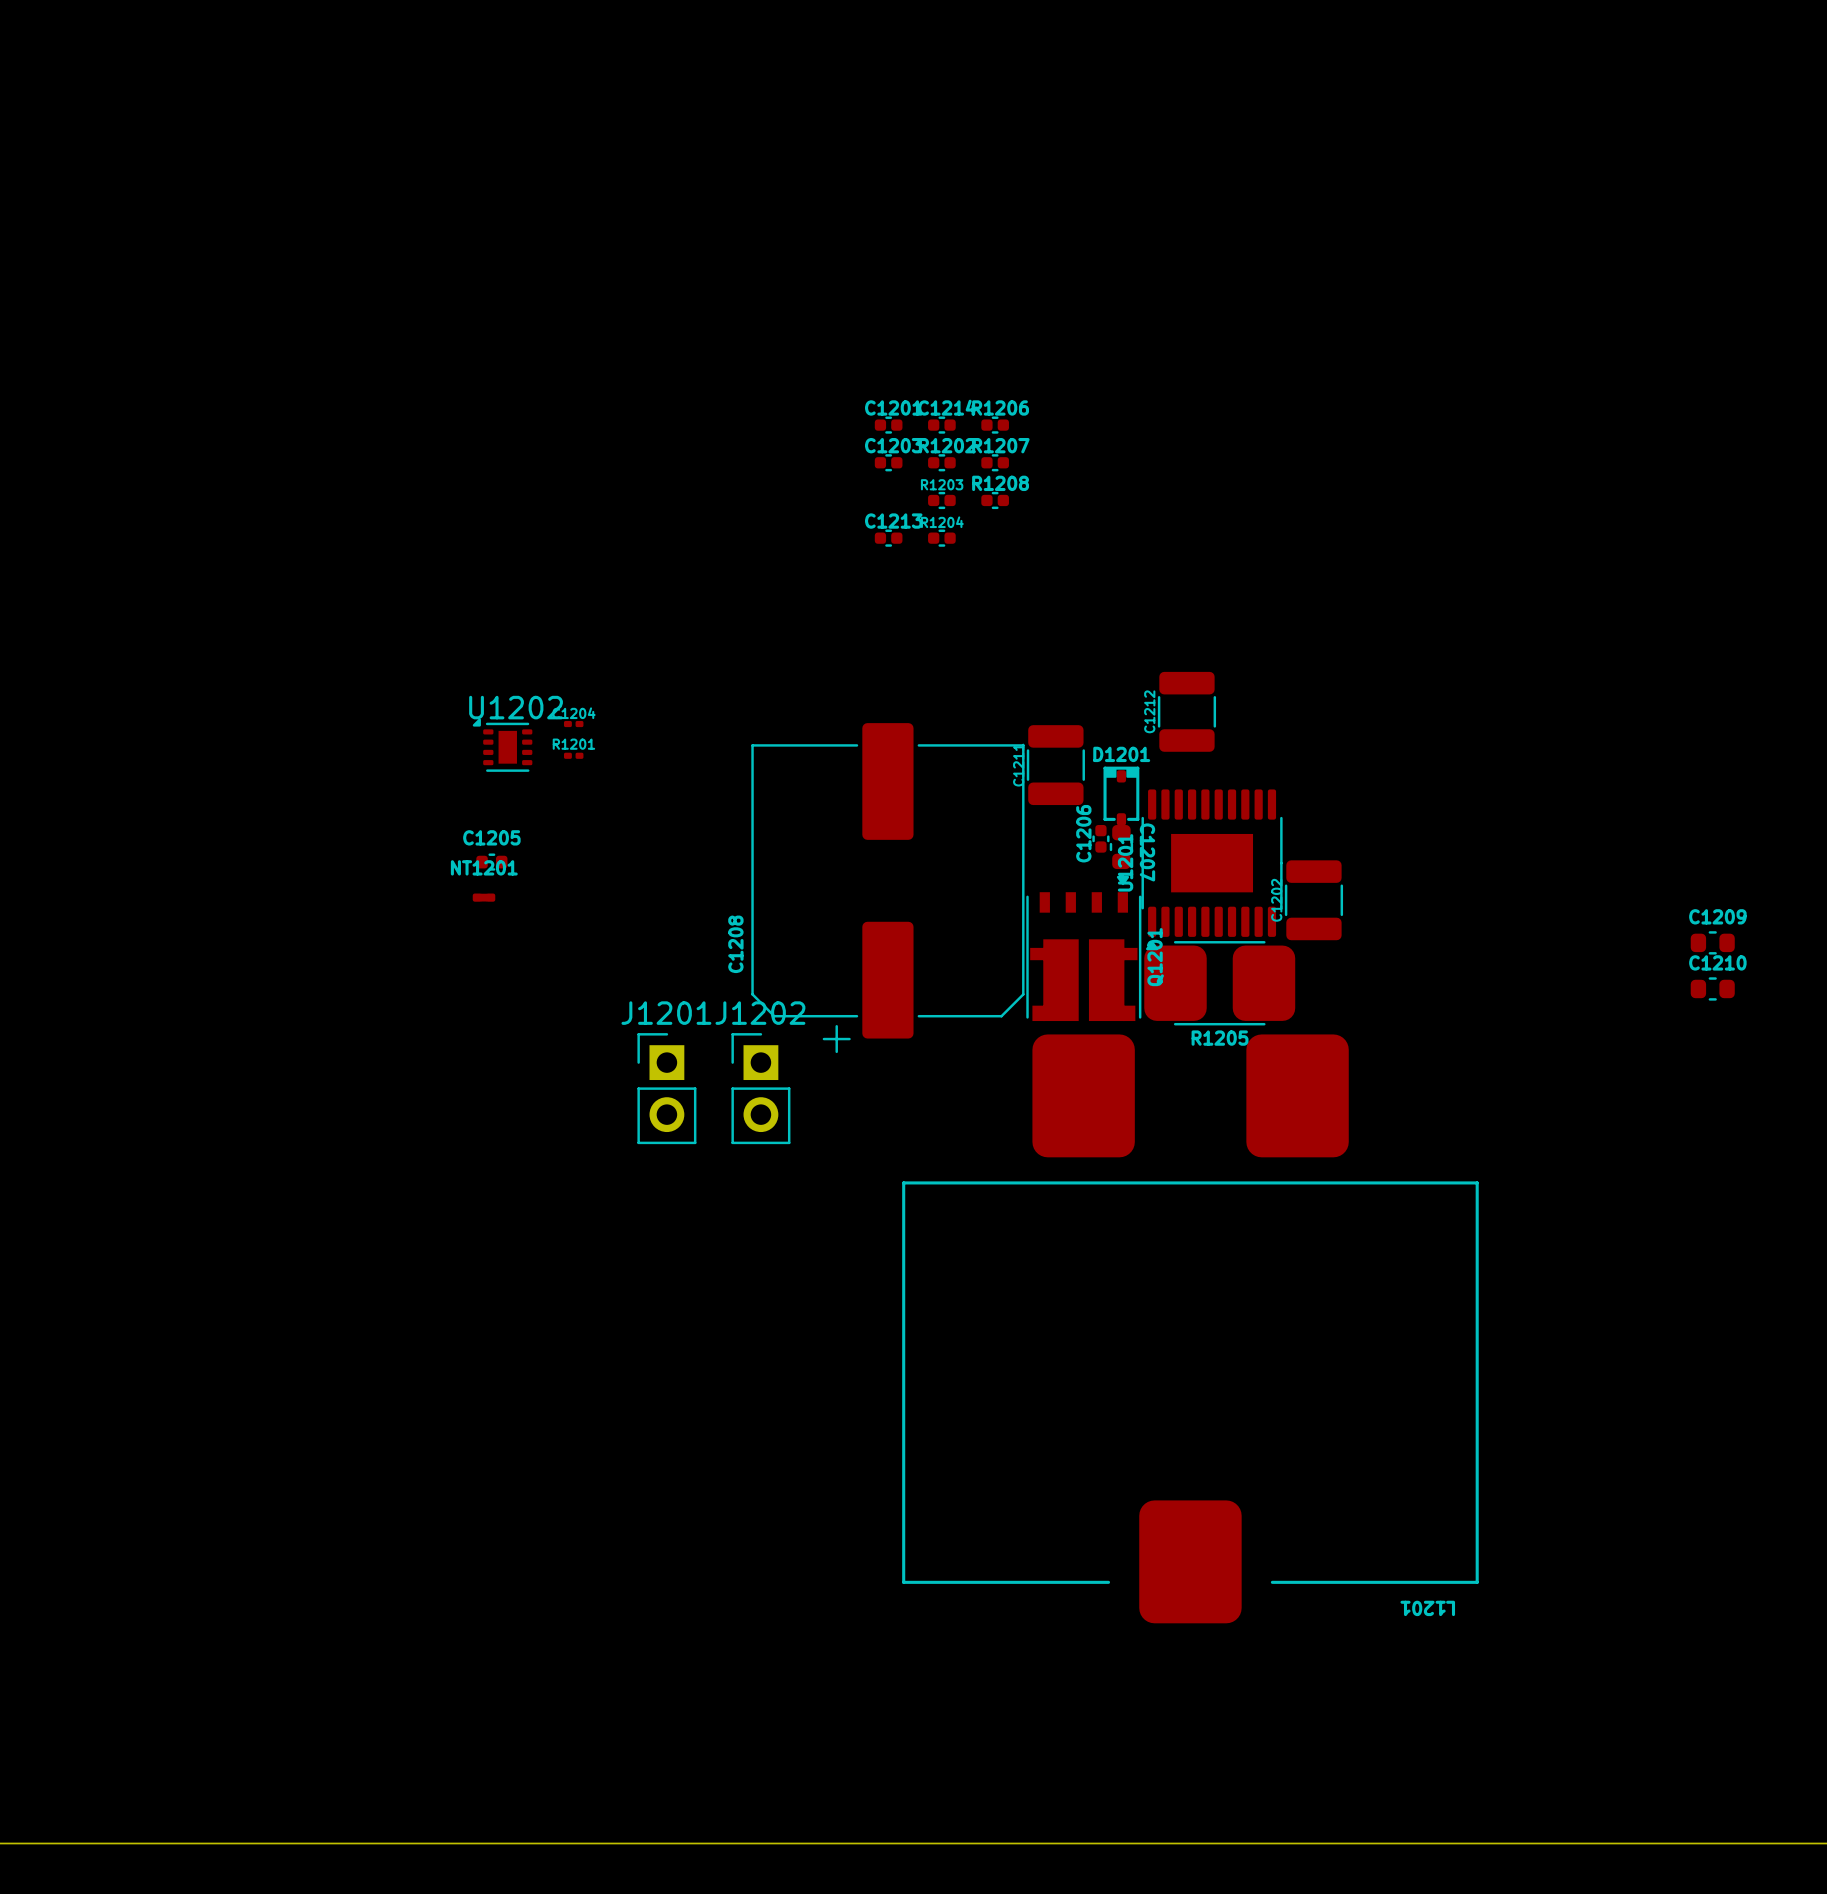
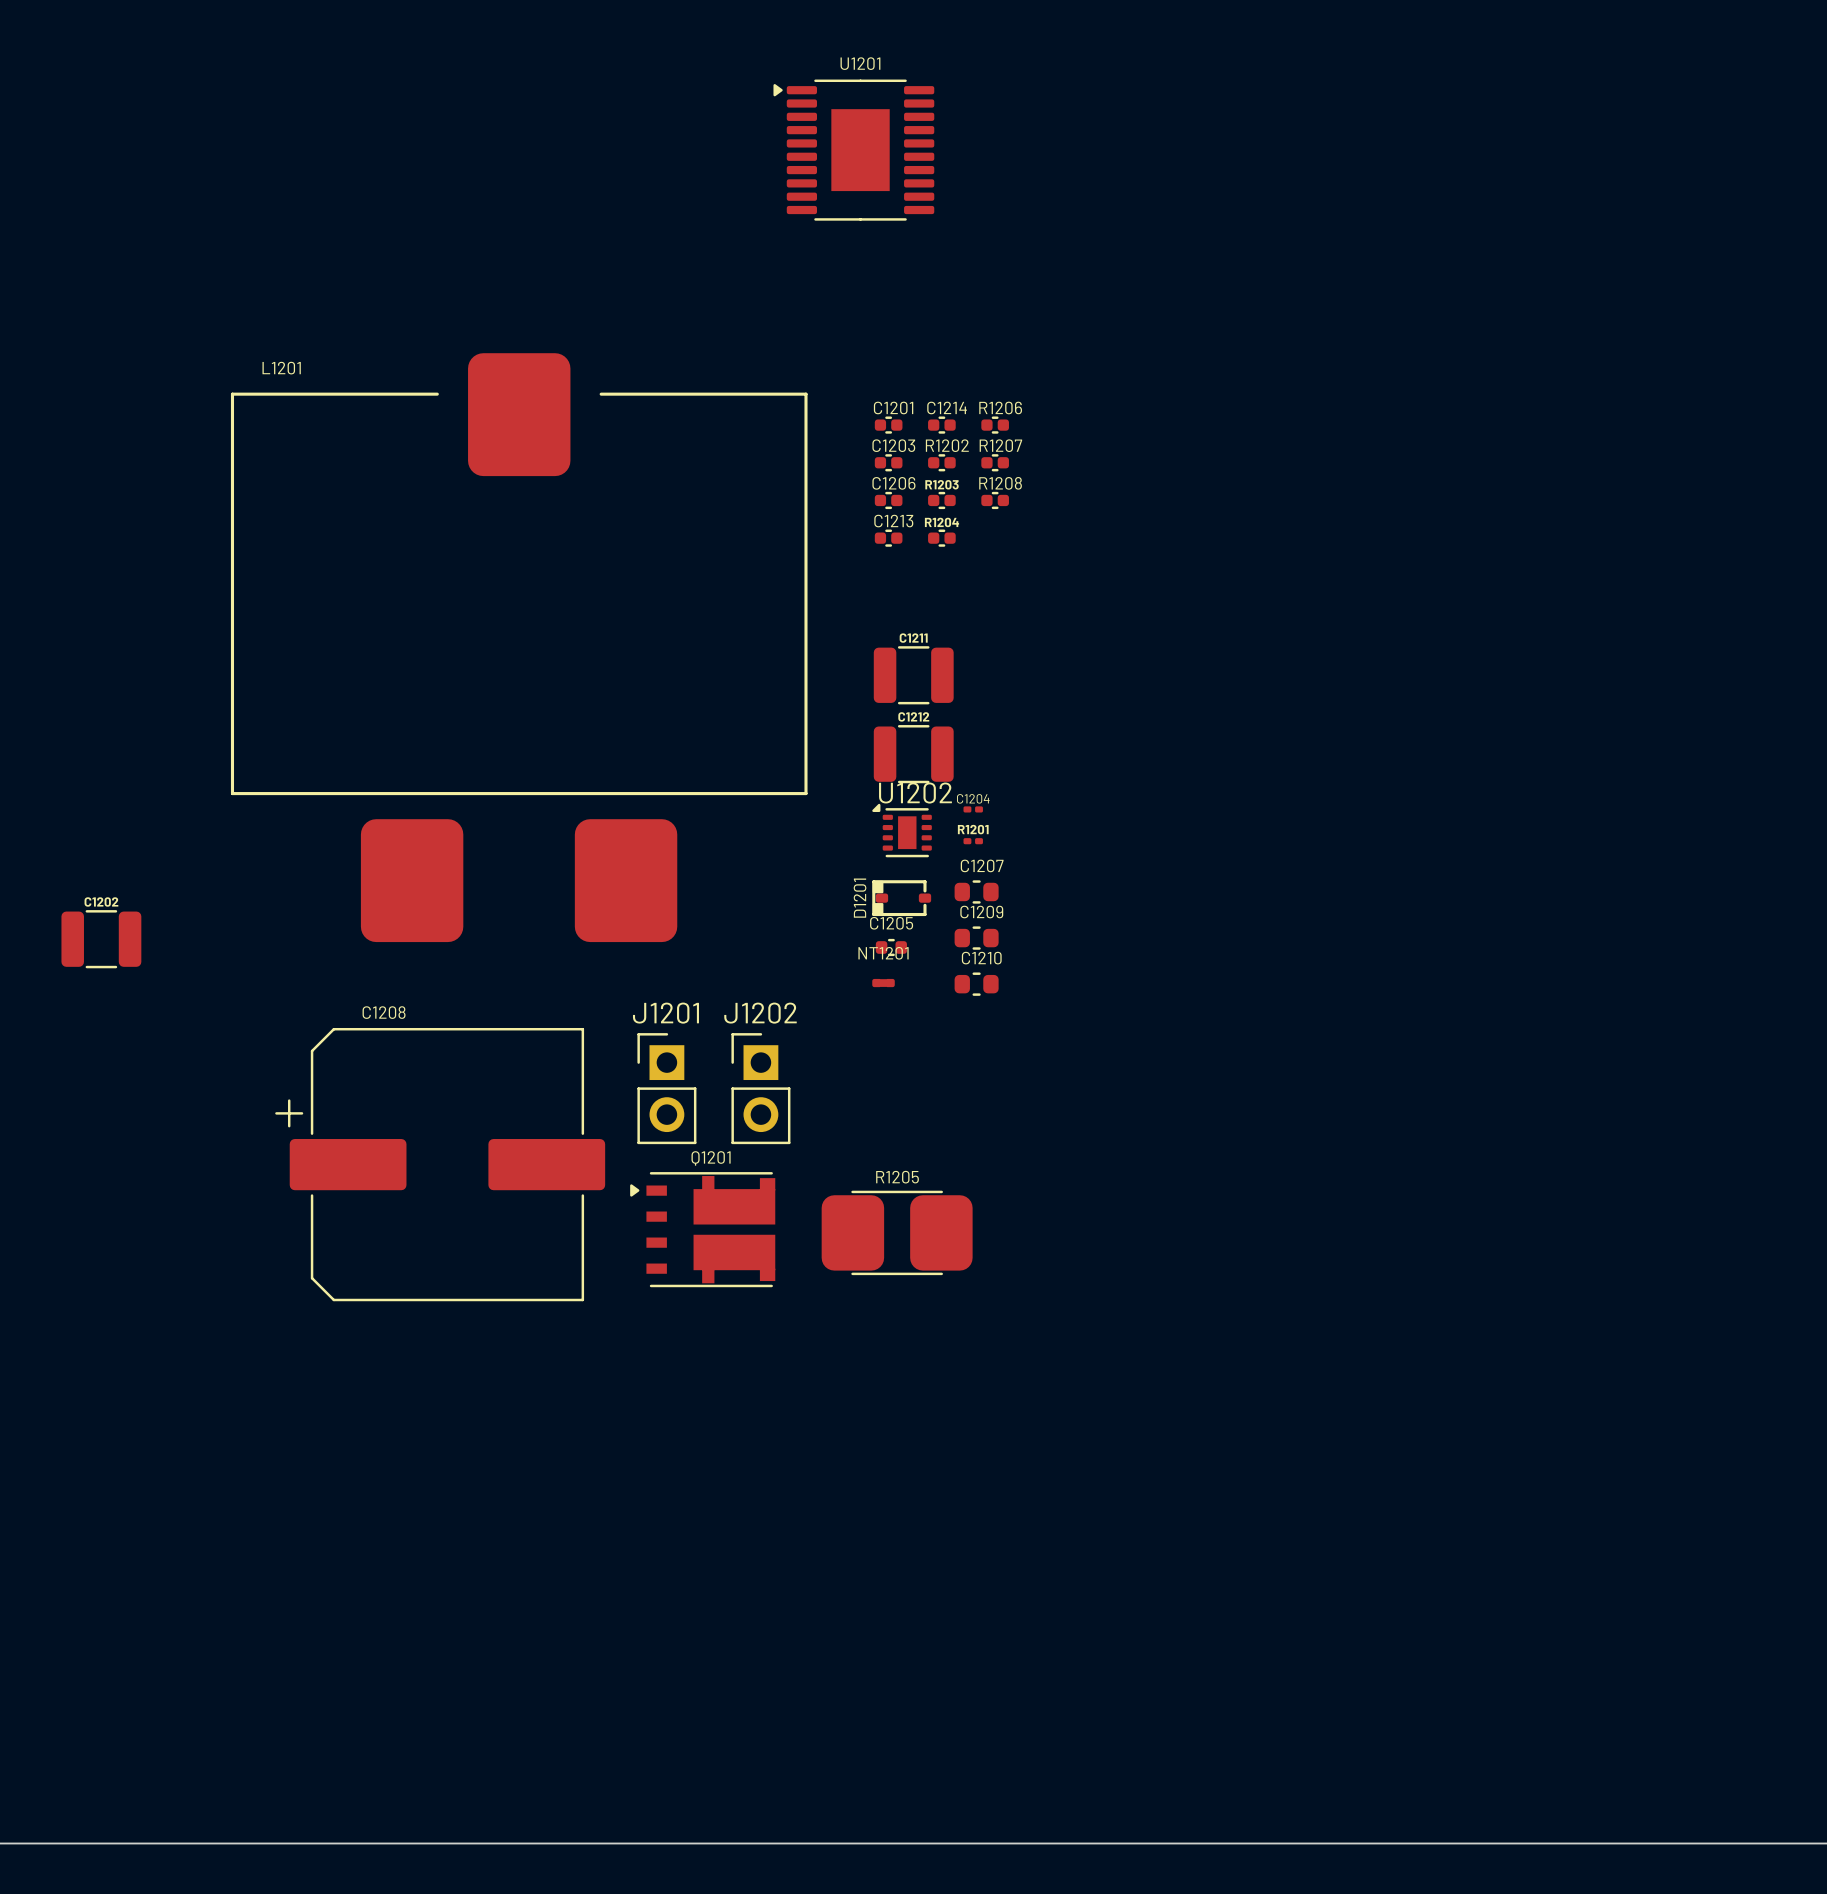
C1212 rotation: 0° (1186, 711) -> 90° clockwise (913, 754)
C1212 position: (1186, 711) -> (913, 754)
C1204 position: (573, 724) -> (973, 809)
U1202 position: (502, 745) -> (902, 830)
R1201 position: (573, 755) -> (973, 841)
C1211 rotation: 0° (1055, 765) -> 90° clockwise (913, 675)
C1211 position: (1055, 765) -> (913, 675)
D1201 rotation: 0° (1121, 796) -> 90° counterclockwise (901, 898)
D1201 position: (1121, 796) -> (901, 898)
C1206 rotation: 0° (1100, 838) -> 90° clockwise (888, 500)
C1206 position: (1100, 838) -> (888, 500)
C1207 rotation: 0° (1121, 847) -> 90° clockwise (976, 891)
C1207 position: (1121, 847) -> (976, 891)
C1205 position: (491, 862) -> (891, 947)
U1201 rotation: 0° (1212, 869) -> 90° clockwise (853, 150)
U1201 position: (1212, 869) -> (853, 150)
C1208 rotation: 0° (887, 888) -> 90° clockwise (440, 1164)
C1208 position: (887, 888) -> (440, 1164)
NT1201 position: (484, 897) -> (883, 983)
C1202 rotation: 0° (1313, 900) -> 90° clockwise (101, 939)
C1202 position: (1313, 900) -> (101, 939)
C1209 position: (1712, 942) -> (976, 938)
Q1201 rotation: 0° (1083, 948) -> 90° counterclockwise (702, 1229)
Q1201 position: (1083, 948) -> (702, 1229)
R1205 position: (1219, 983) -> (897, 1232)
C1210 position: (1712, 988) -> (976, 984)
R1205 name position: R1205 (1220, 1038) -> R1205 (897, 1177)
L1201 rotation: 0° (1190, 1328) -> 180° (519, 647)
L1201 position: (1190, 1328) -> (519, 647)

